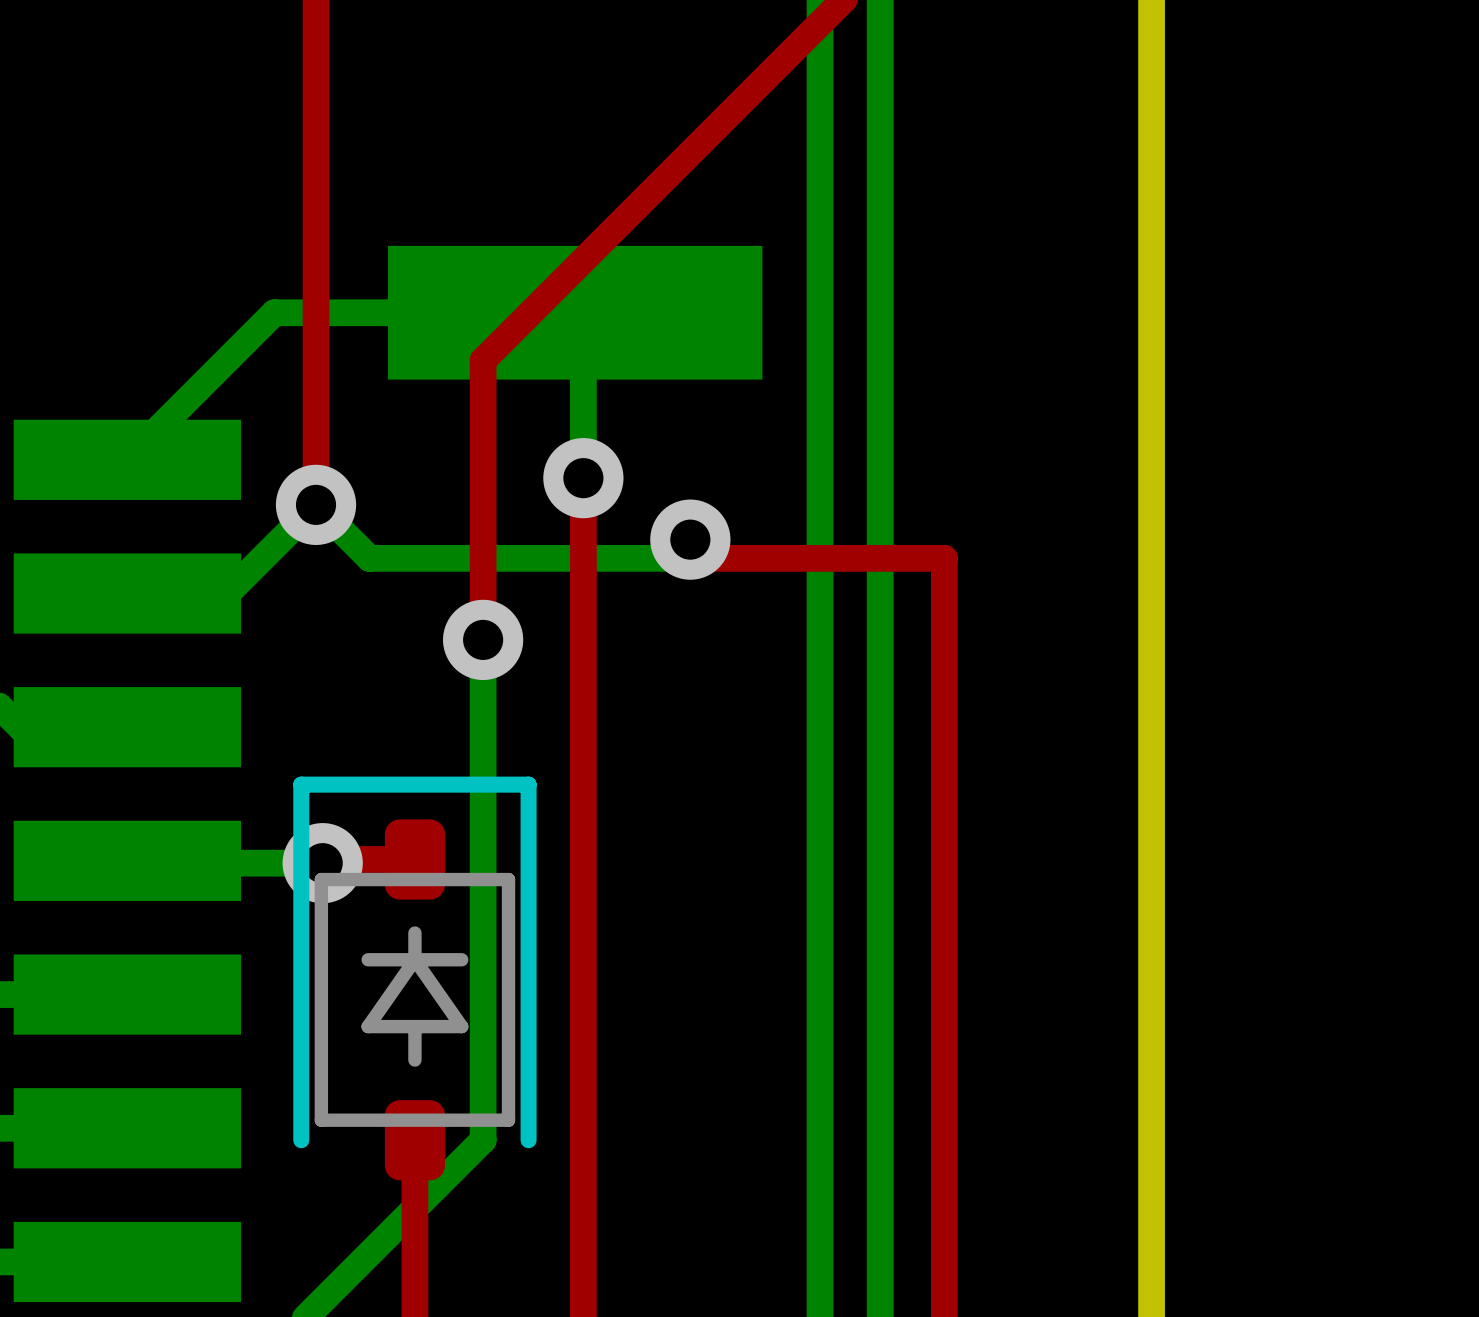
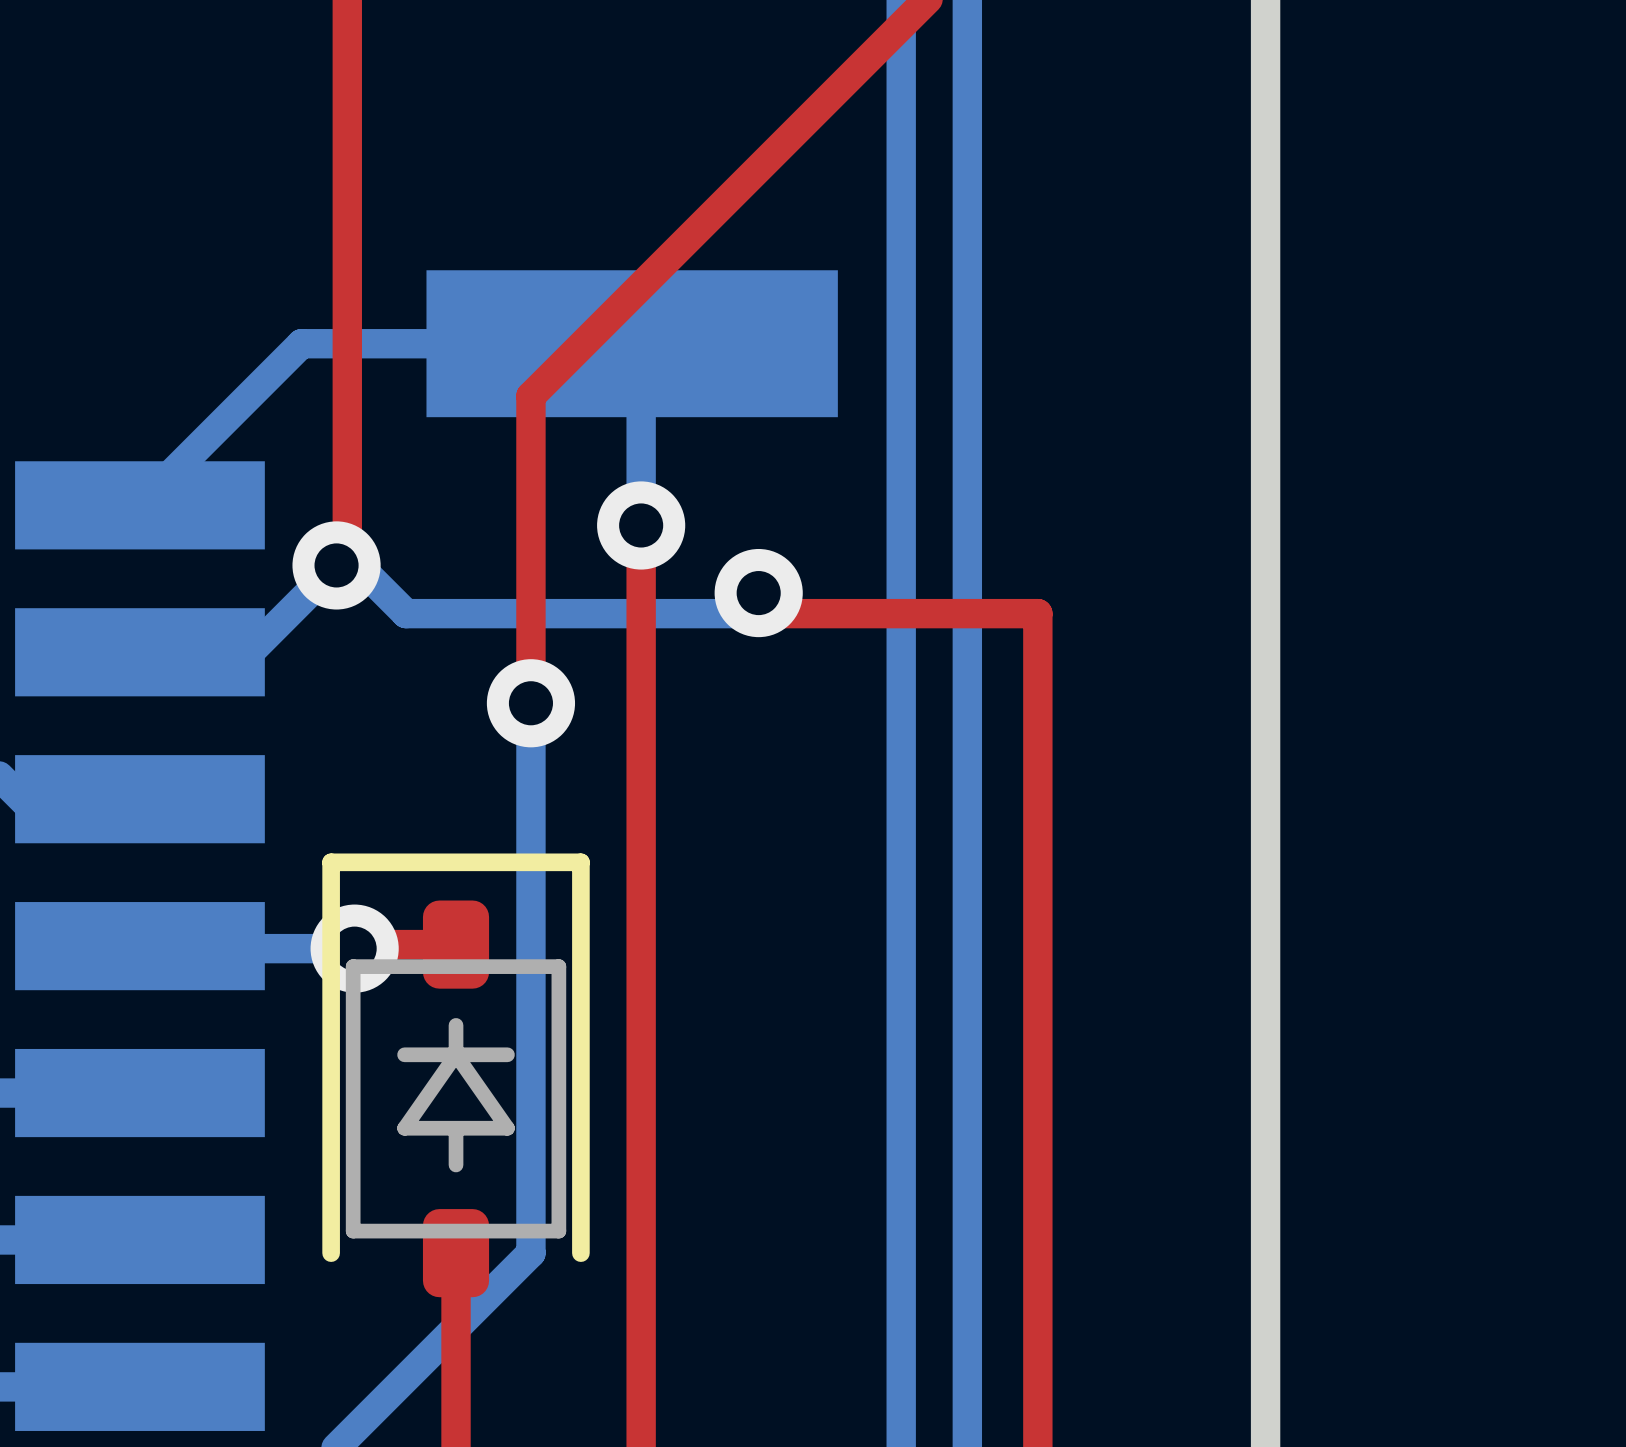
via position: (316, 504) -> (336, 565)

